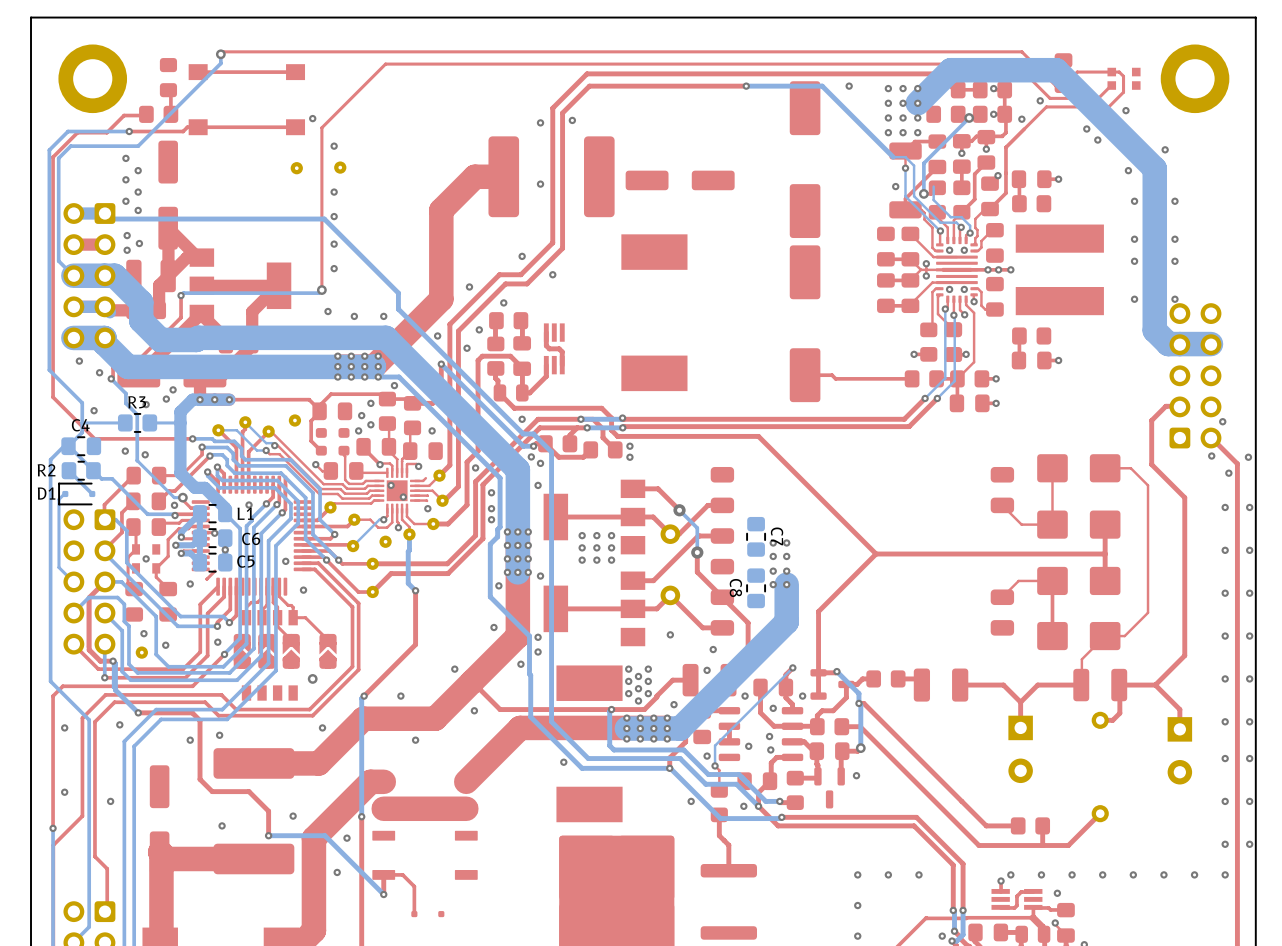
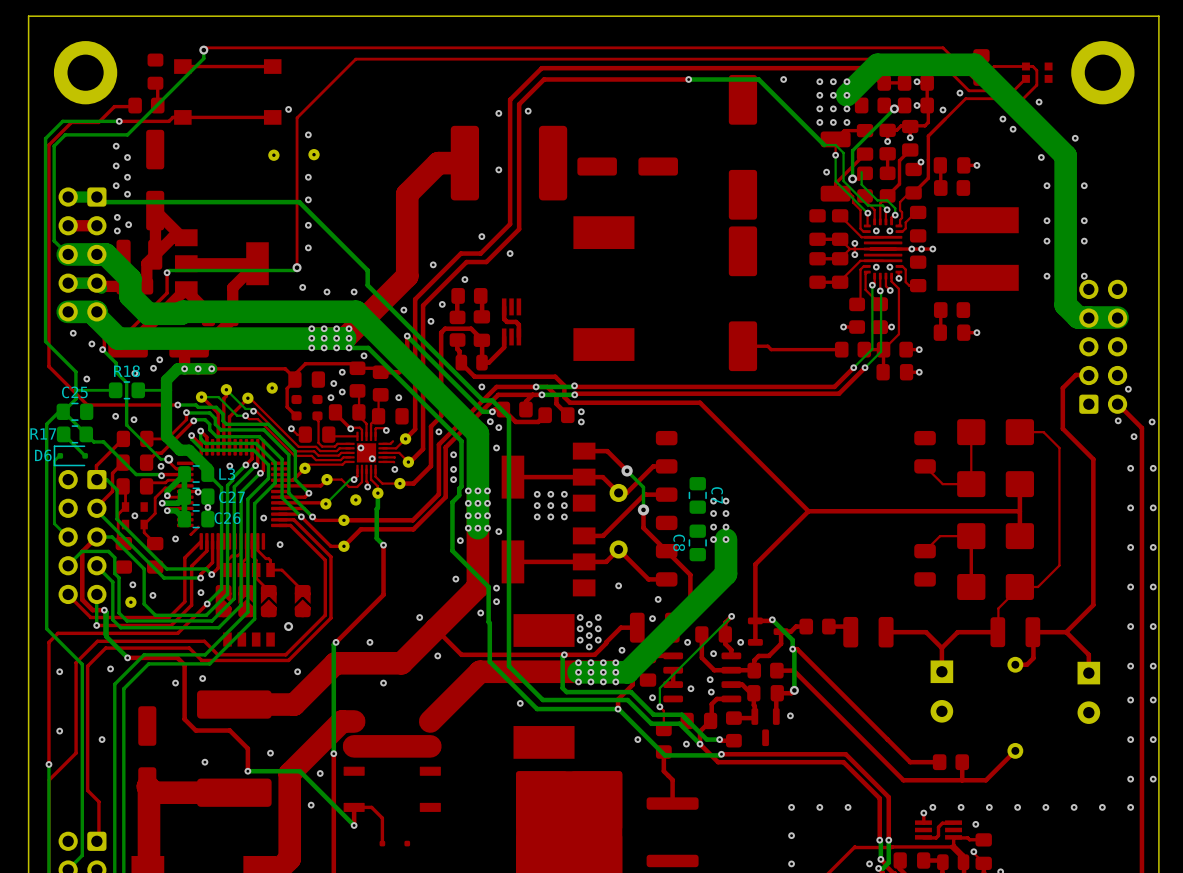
R3 name: R3 (137, 402) -> R18 (126, 371)
C4 name: C4 (80, 425) -> C25 (74, 392)
R2 name: R2 (46, 470) -> R17 (43, 433)
D1 name: D1 (46, 493) -> D6 (43, 455)
L1 name: L1 (245, 513) -> L3 (227, 474)
C6 name: C6 (251, 538) -> C27 (232, 497)
C5 name: C5 (245, 561) -> C26 (227, 518)

